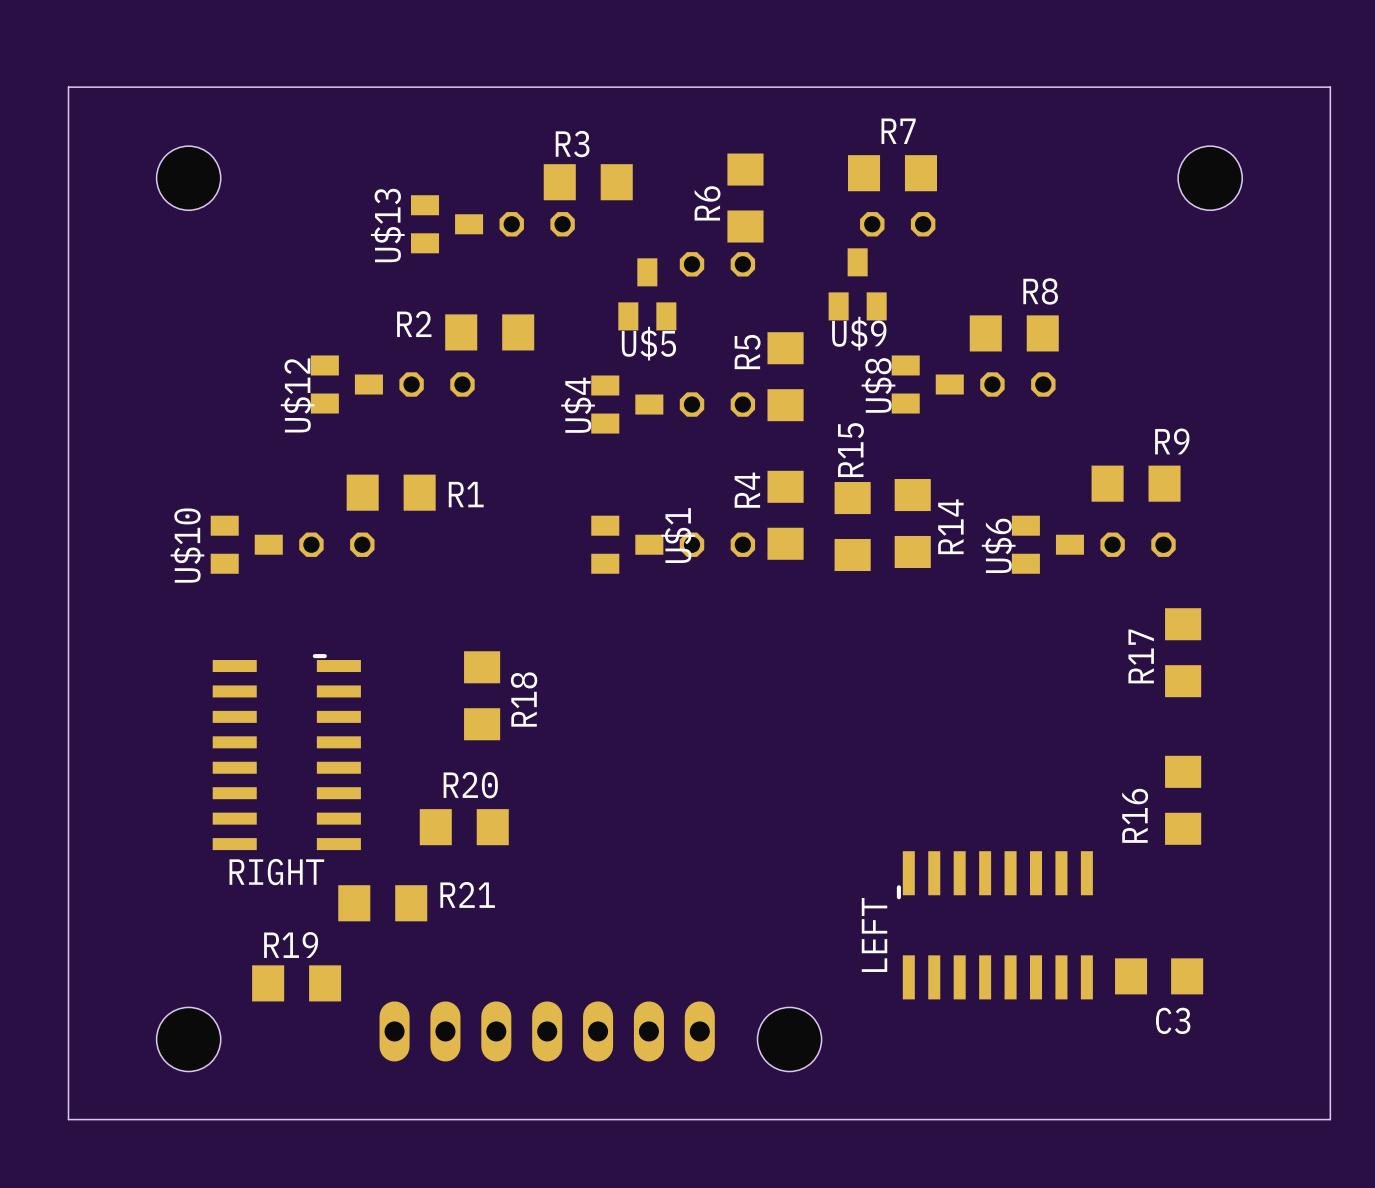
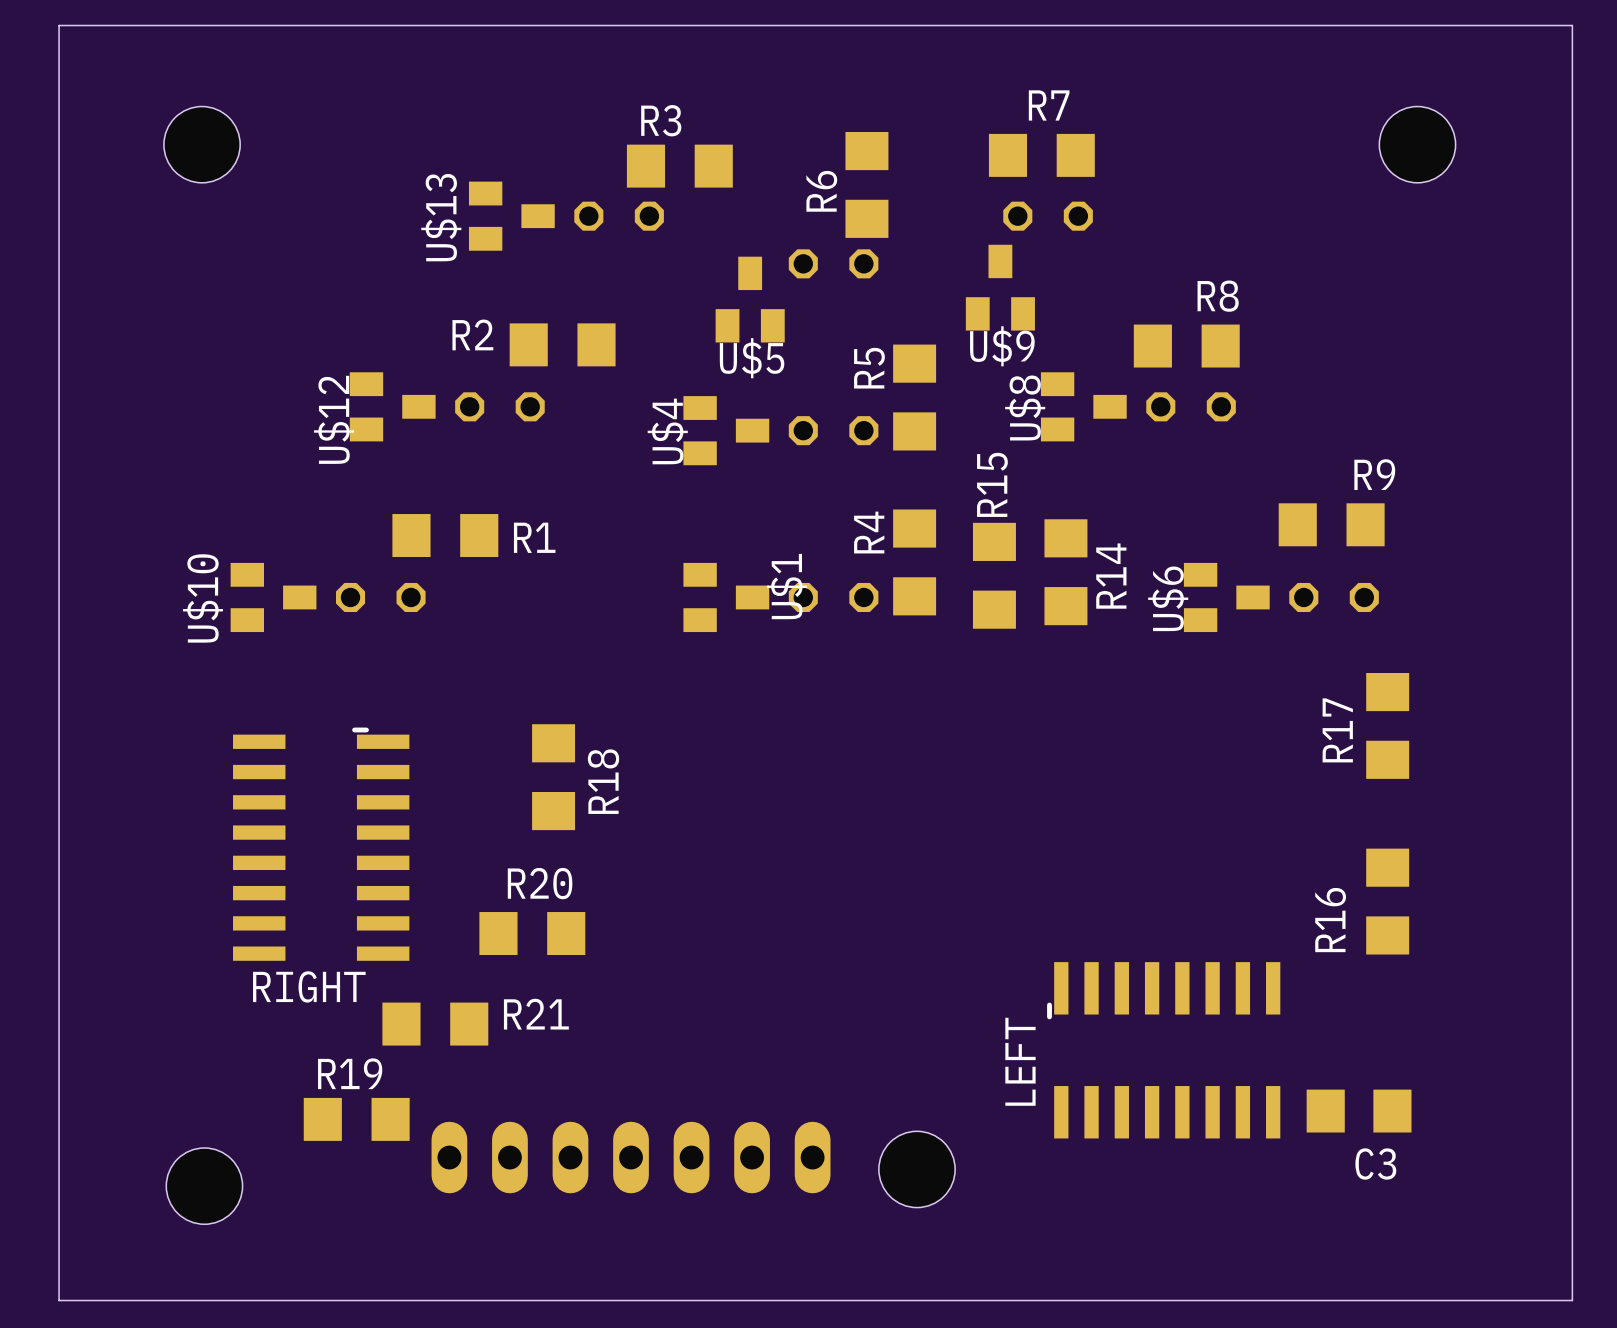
board edge: (1330, 87) (68, 87) (68, 1119) (1330, 1119) (1330, 87) -> (1572, 25) (1572, 1300) (59, 1300) (59, 25) (1572, 25)
hole position: (188, 178) -> (202, 144)
hole position: (1210, 178) -> (1417, 144)
R19 position: (296, 983) -> (356, 1119)
part position: (547, 1031) -> (631, 1157)
hole position: (789, 1039) -> (917, 1169)

